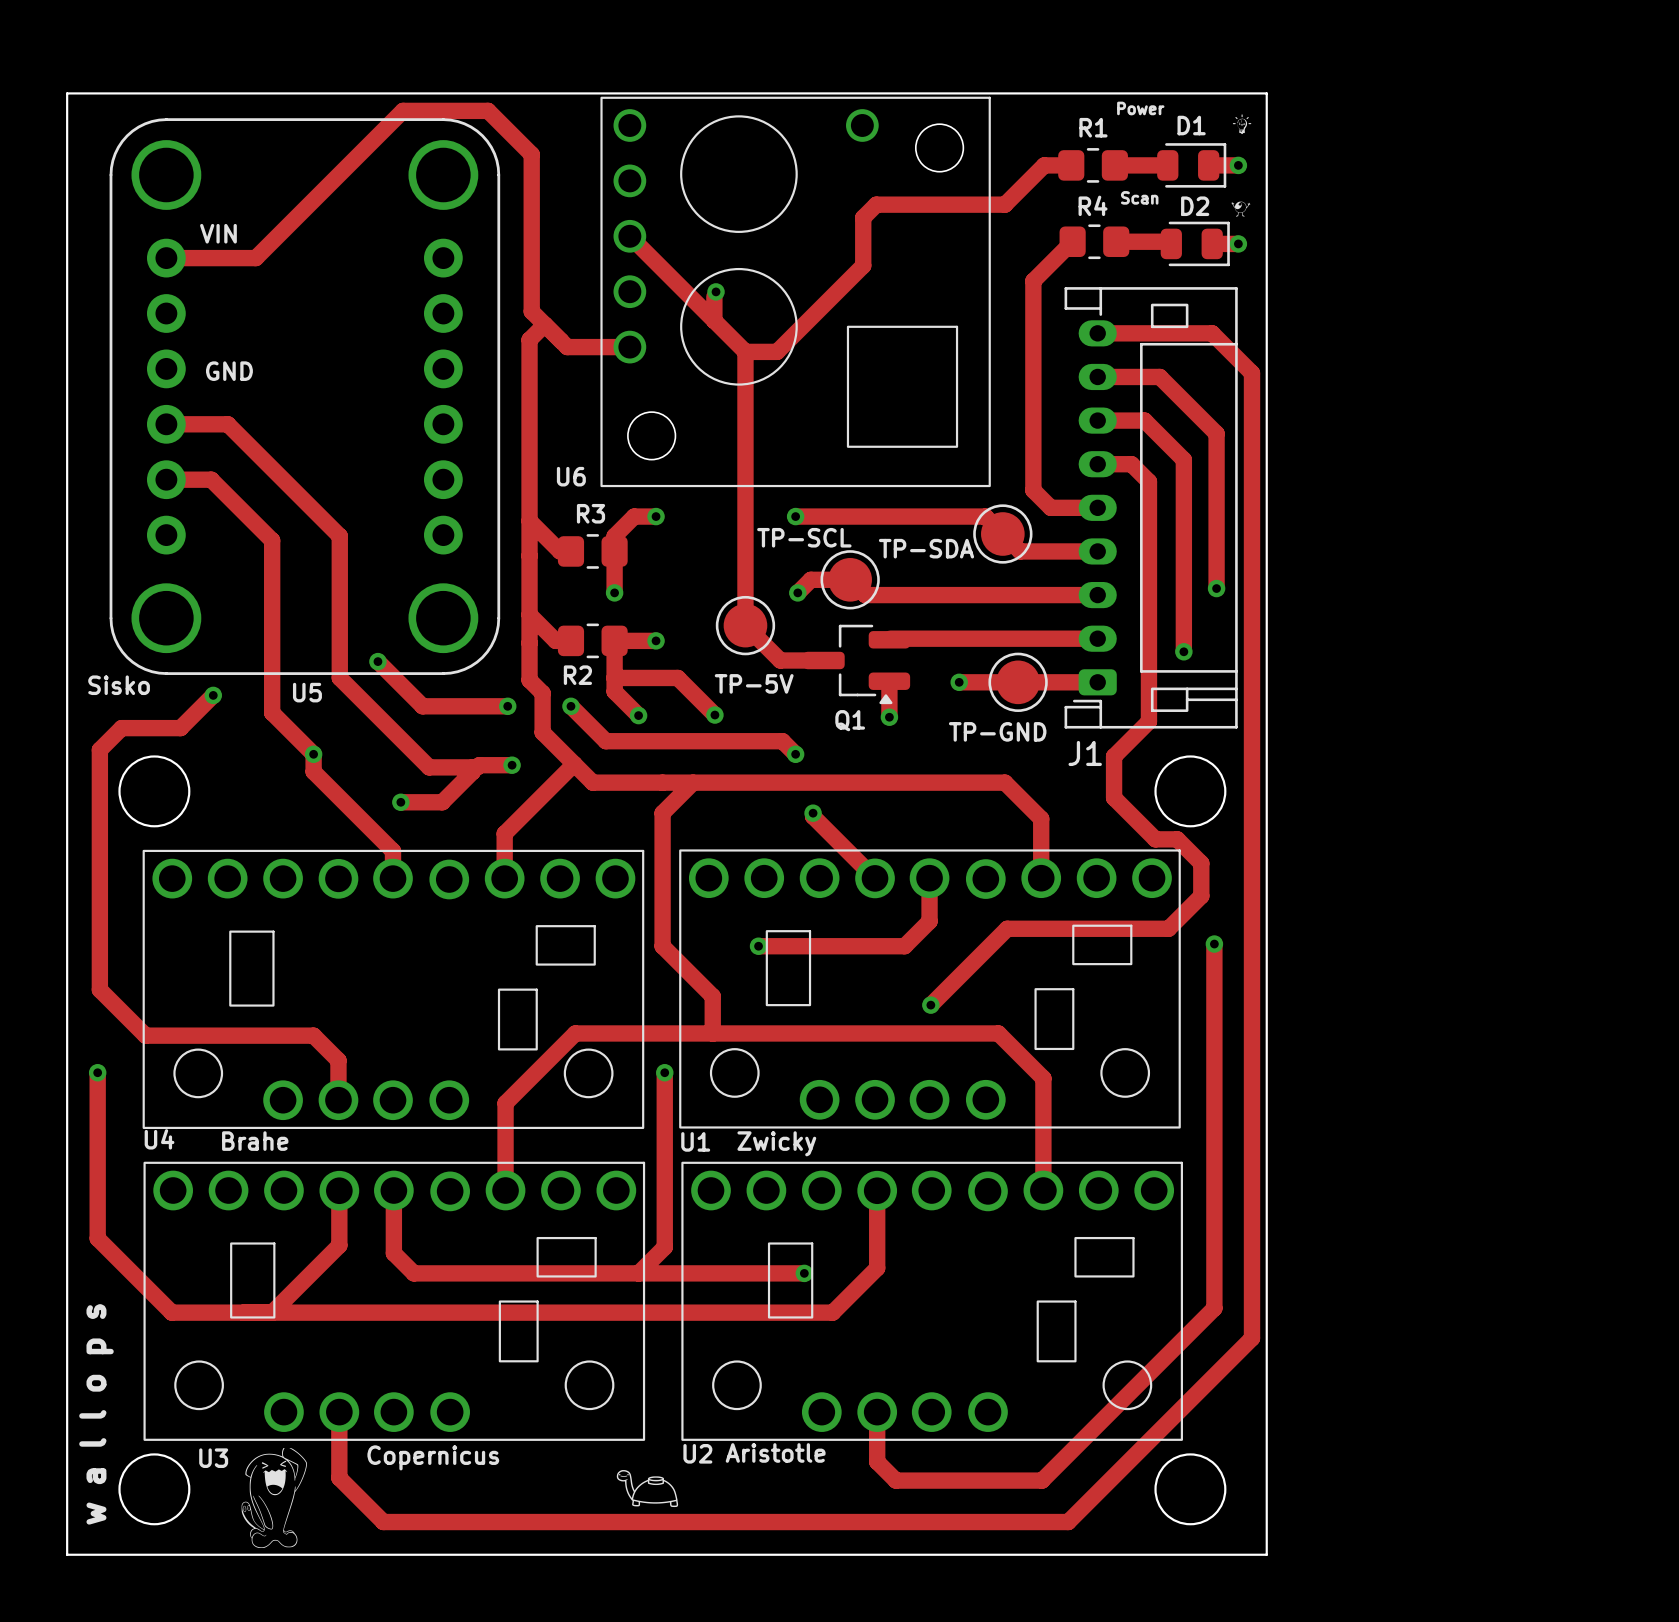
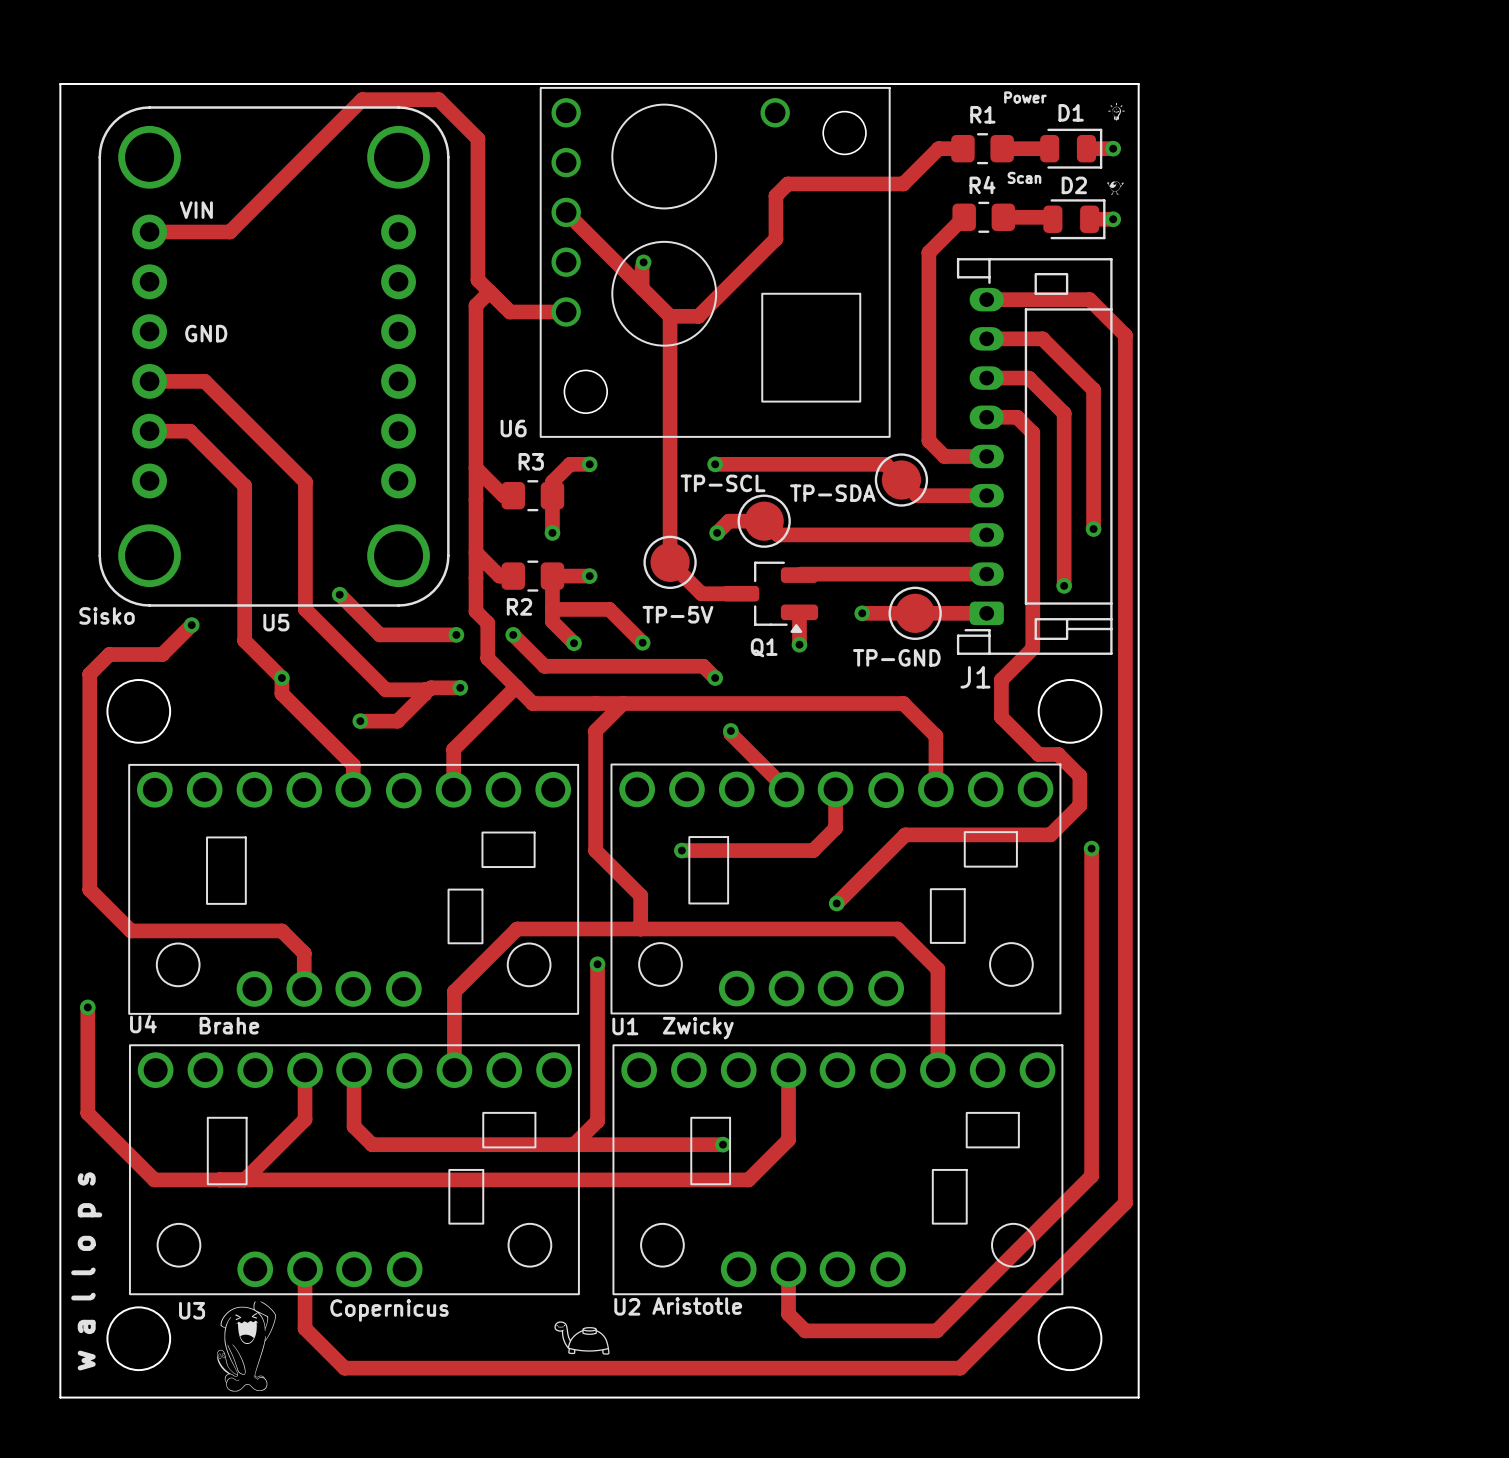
track: (97, 1072) (97, 1120) -> none
via position: (97, 1072) -> (87, 1007)

